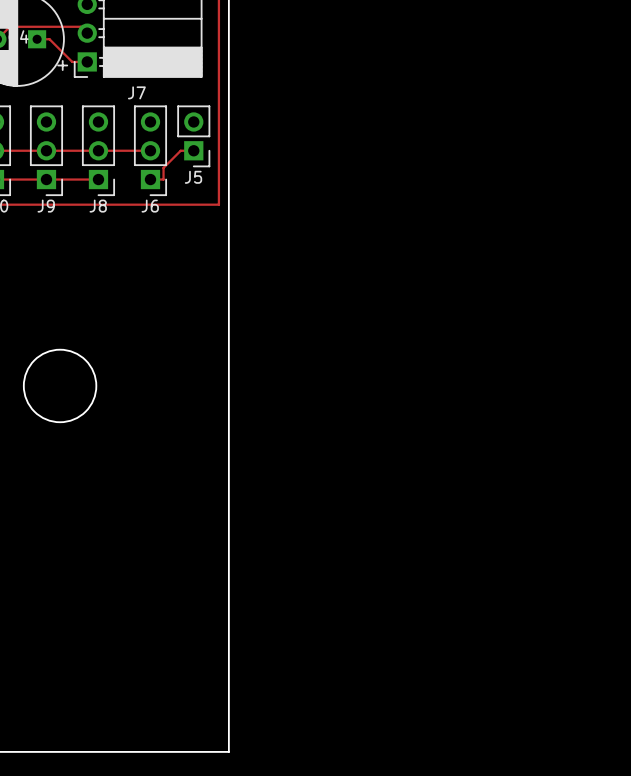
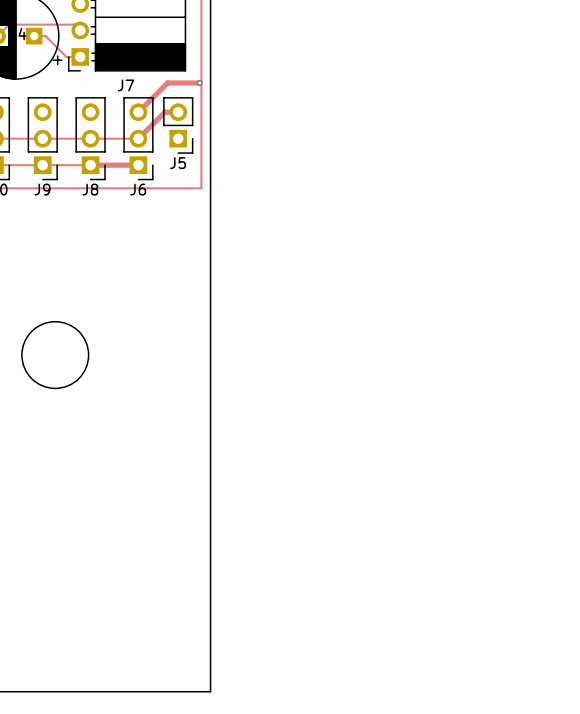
track: none -> (199, 83) (167, 83) (138, 112)
via: none -> (199, 83)
track: none -> (178, 112) (164, 112) (138, 138)
track: (193, 150) (180, 150) (163, 167) (163, 179) (150, 179) -> (90, 165) (138, 165)

